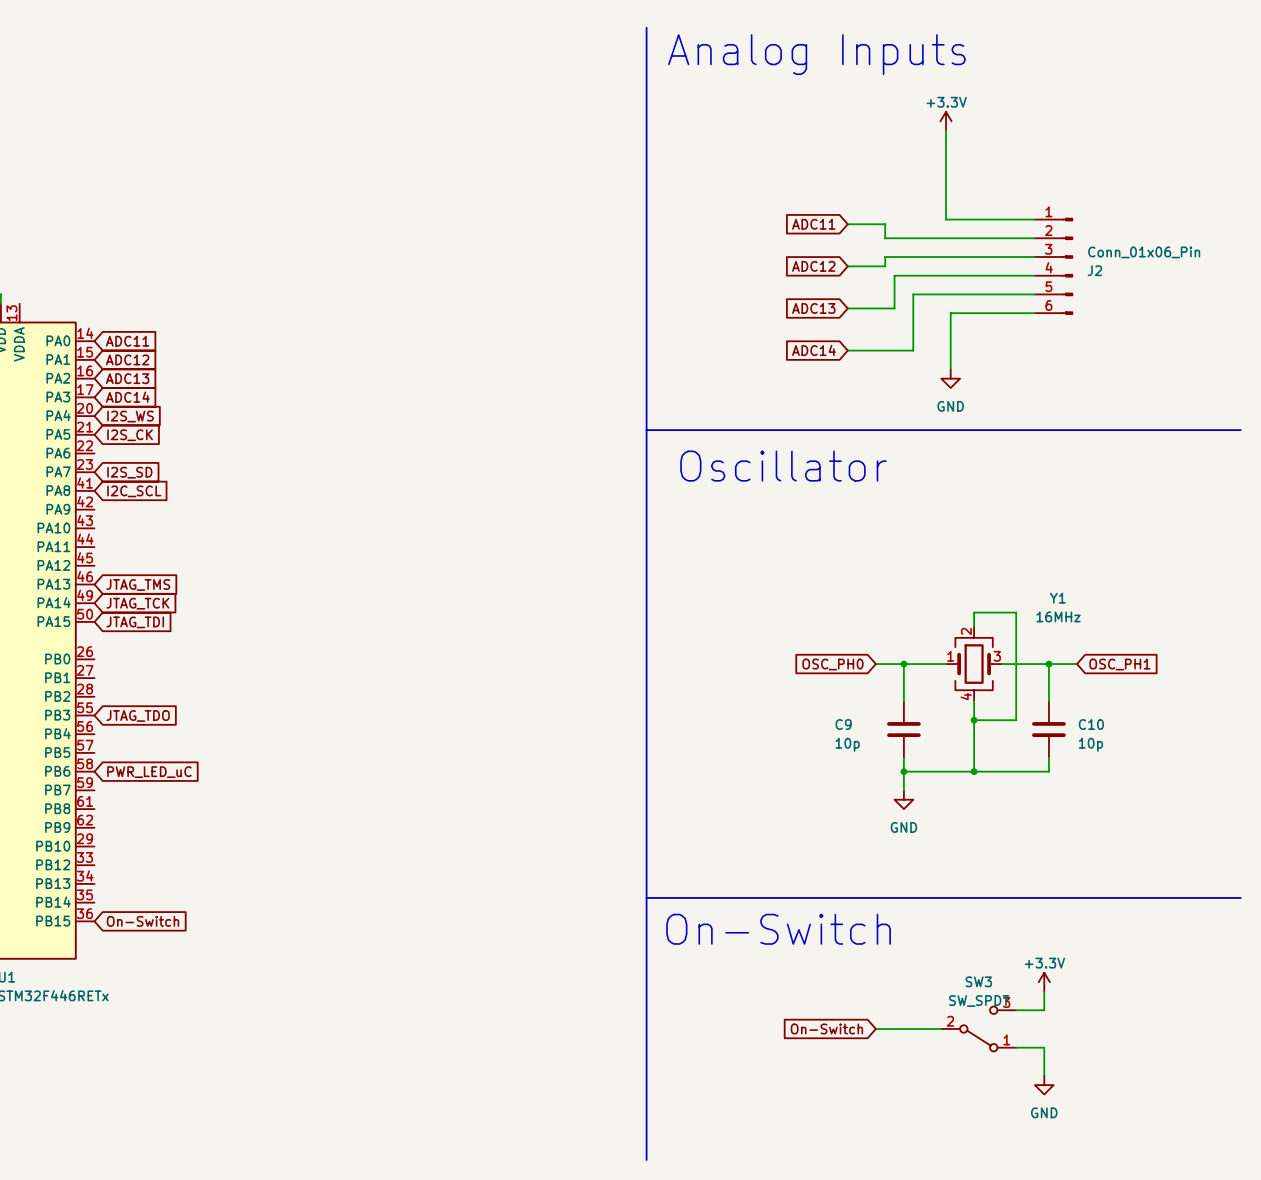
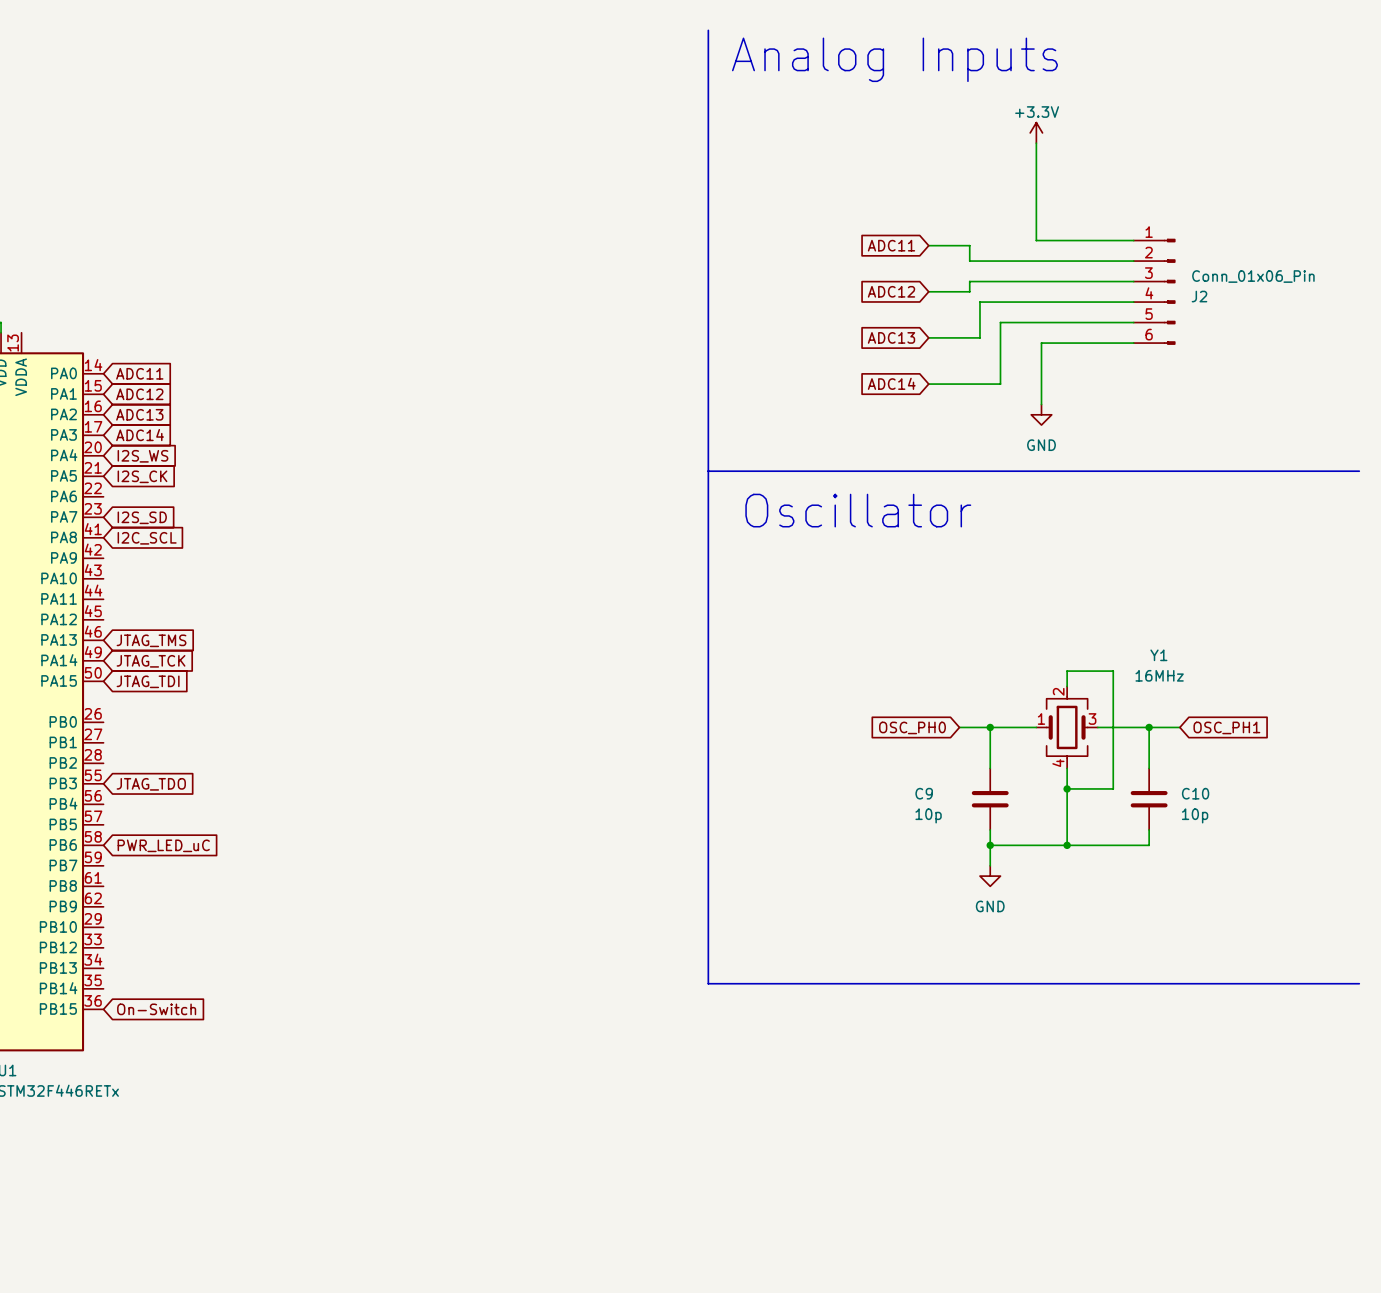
line: (646, 897) (646, 1159) -> none
text: On-Switch (778, 929) -> none
power symbol: +3.3V (1044, 982) -> none
wire: (1044, 991) (1044, 1010) (1016, 1010) -> none
global label: On-Switch (826, 1028) -> none
wire: (875, 1028) (941, 1028) -> none
SW3: SW_SPDT (978, 1028) -> none
wire: (1016, 1047) (1044, 1047) (1044, 1075) -> none
power symbol: GND (1044, 1085) -> none

